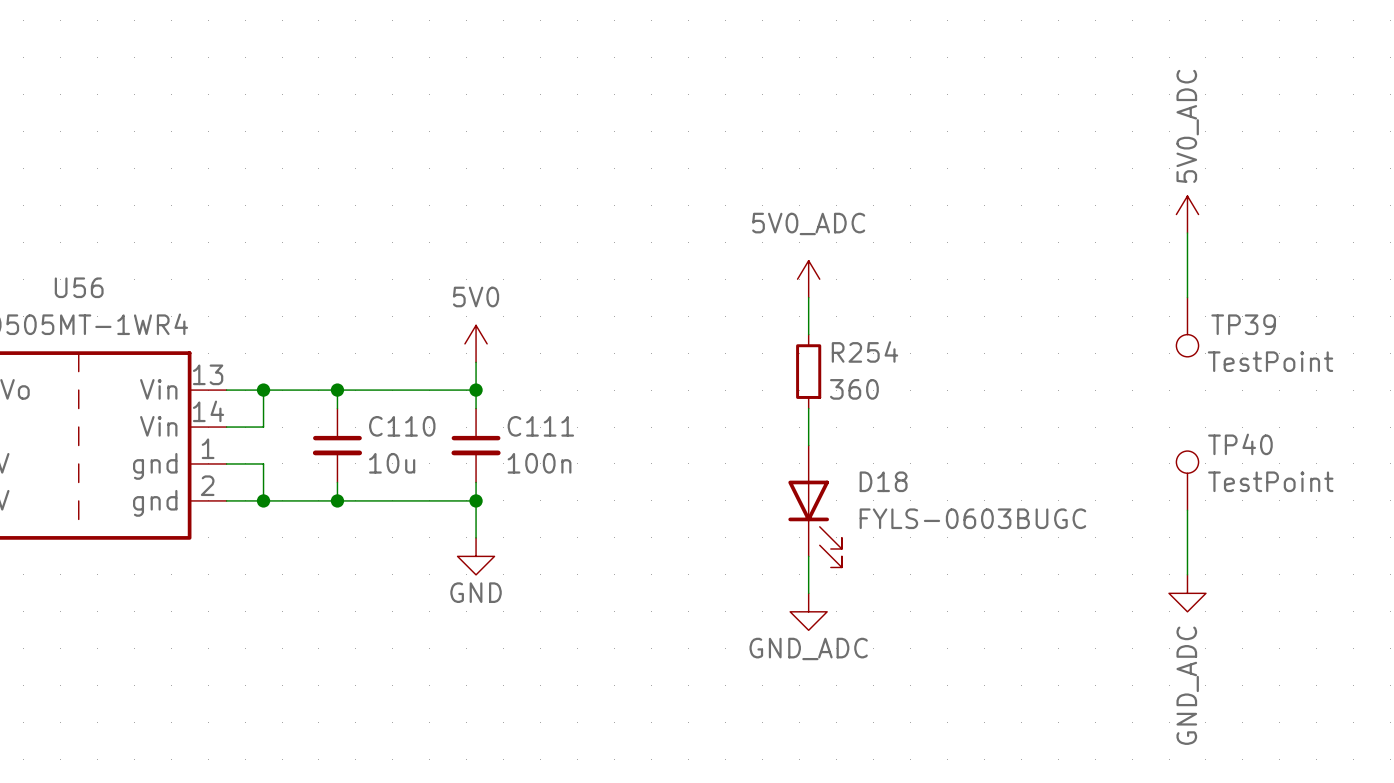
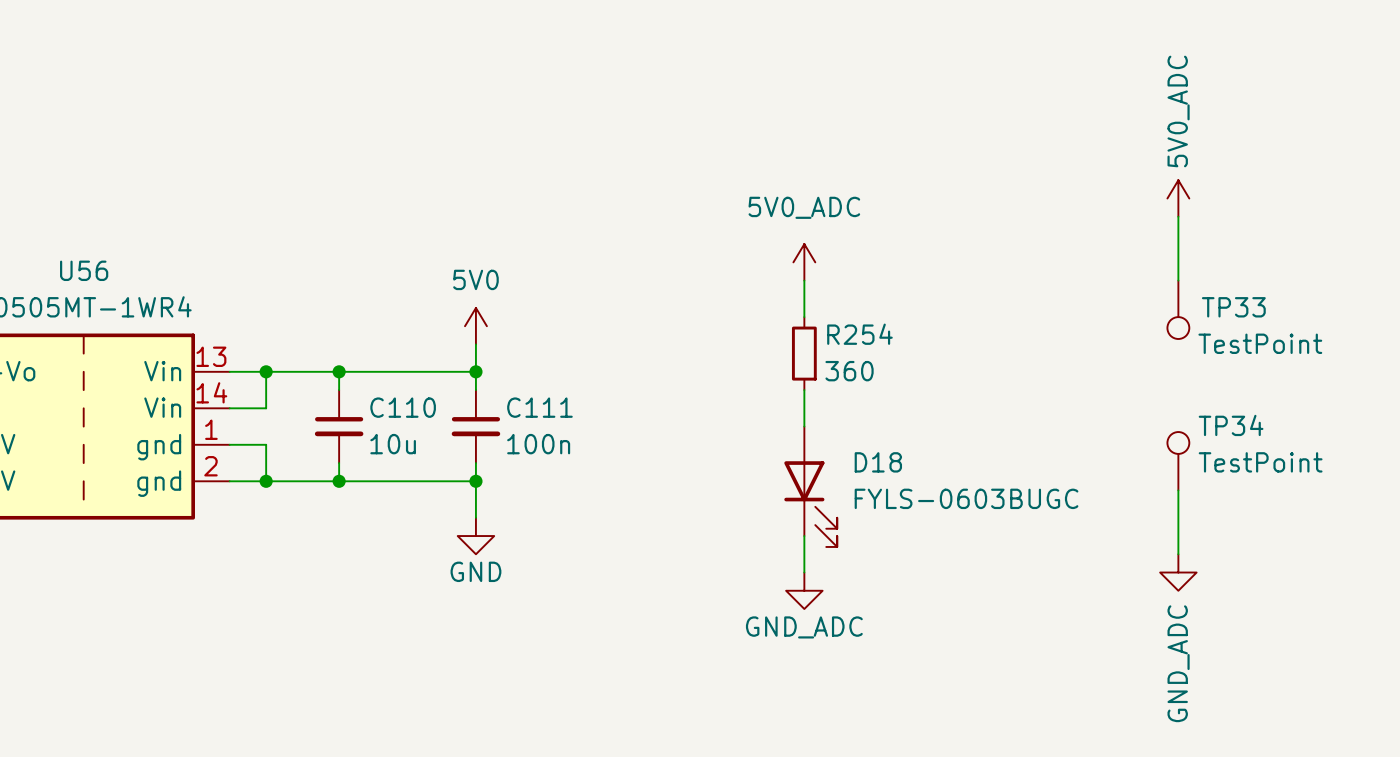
TP39 name: TP39 (1243, 324) -> TP33 (1233, 307)
TP40 name: TP40 (1240, 444) -> TP34 (1231, 425)

